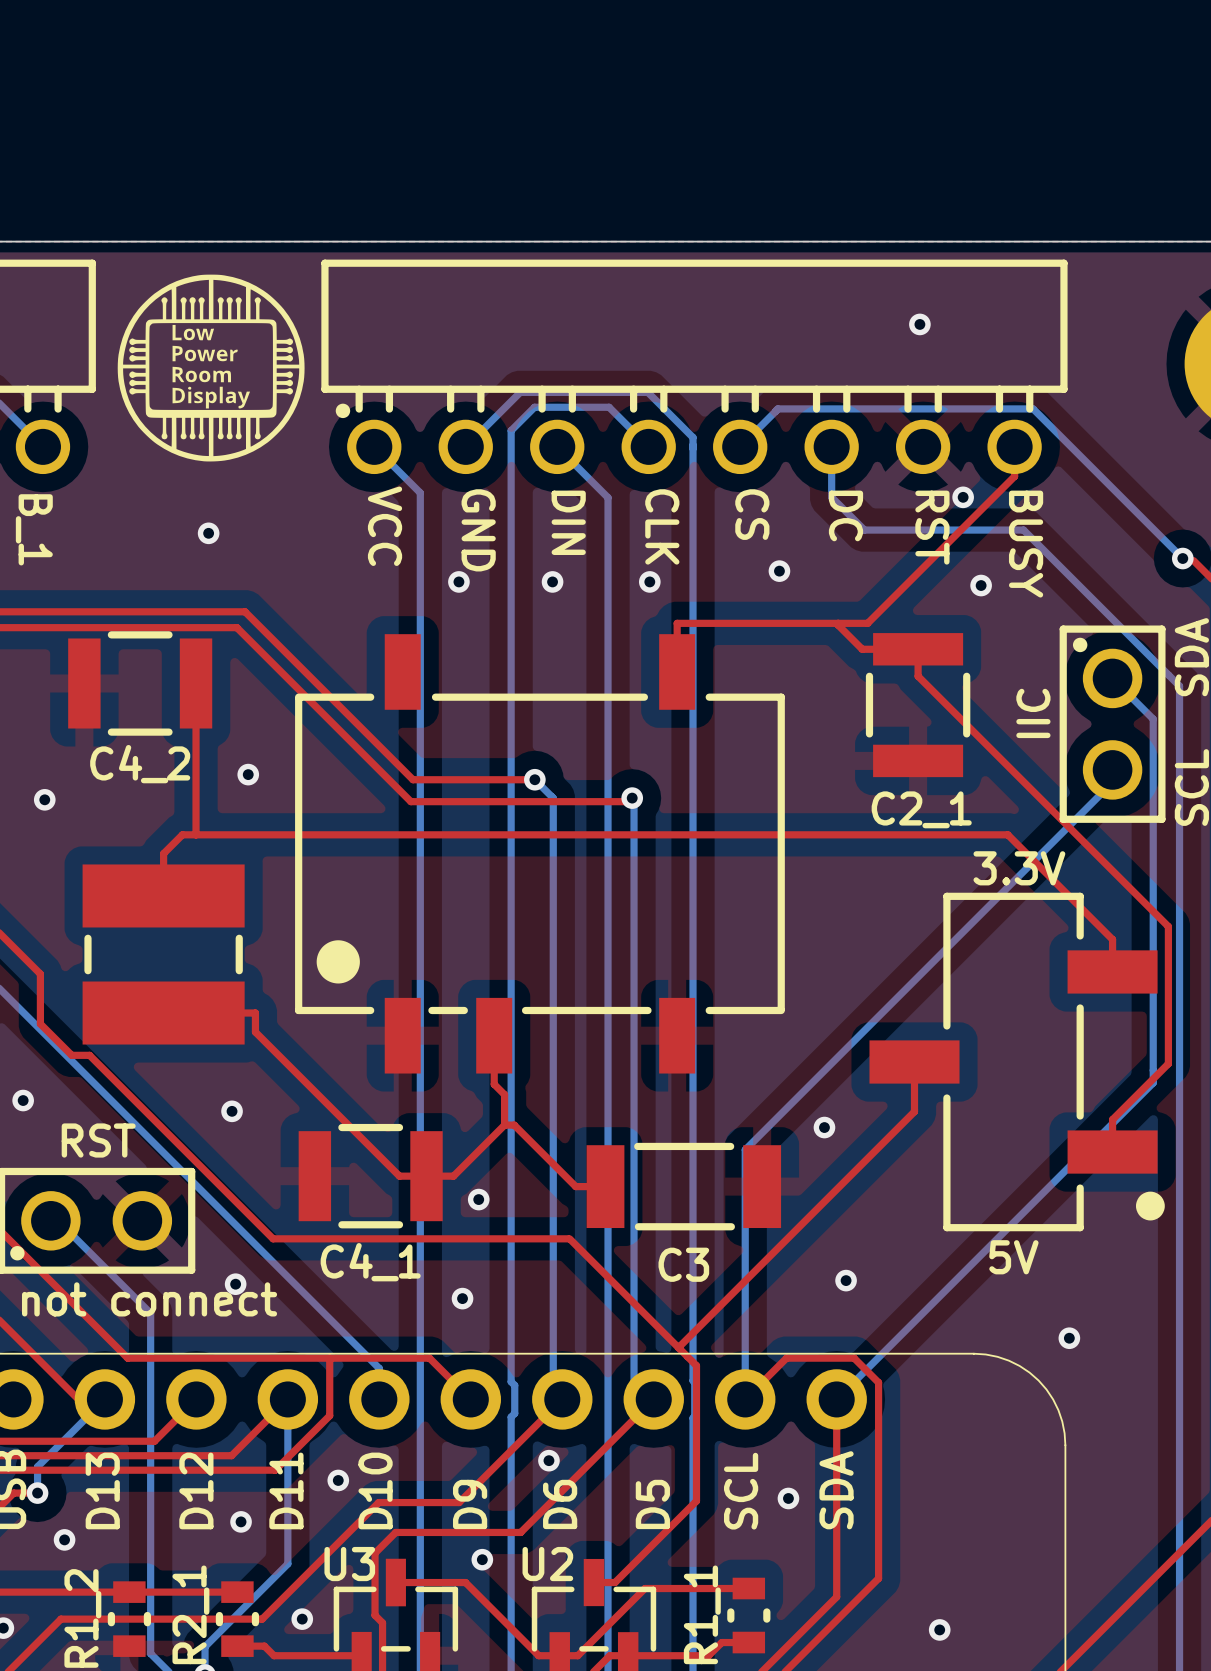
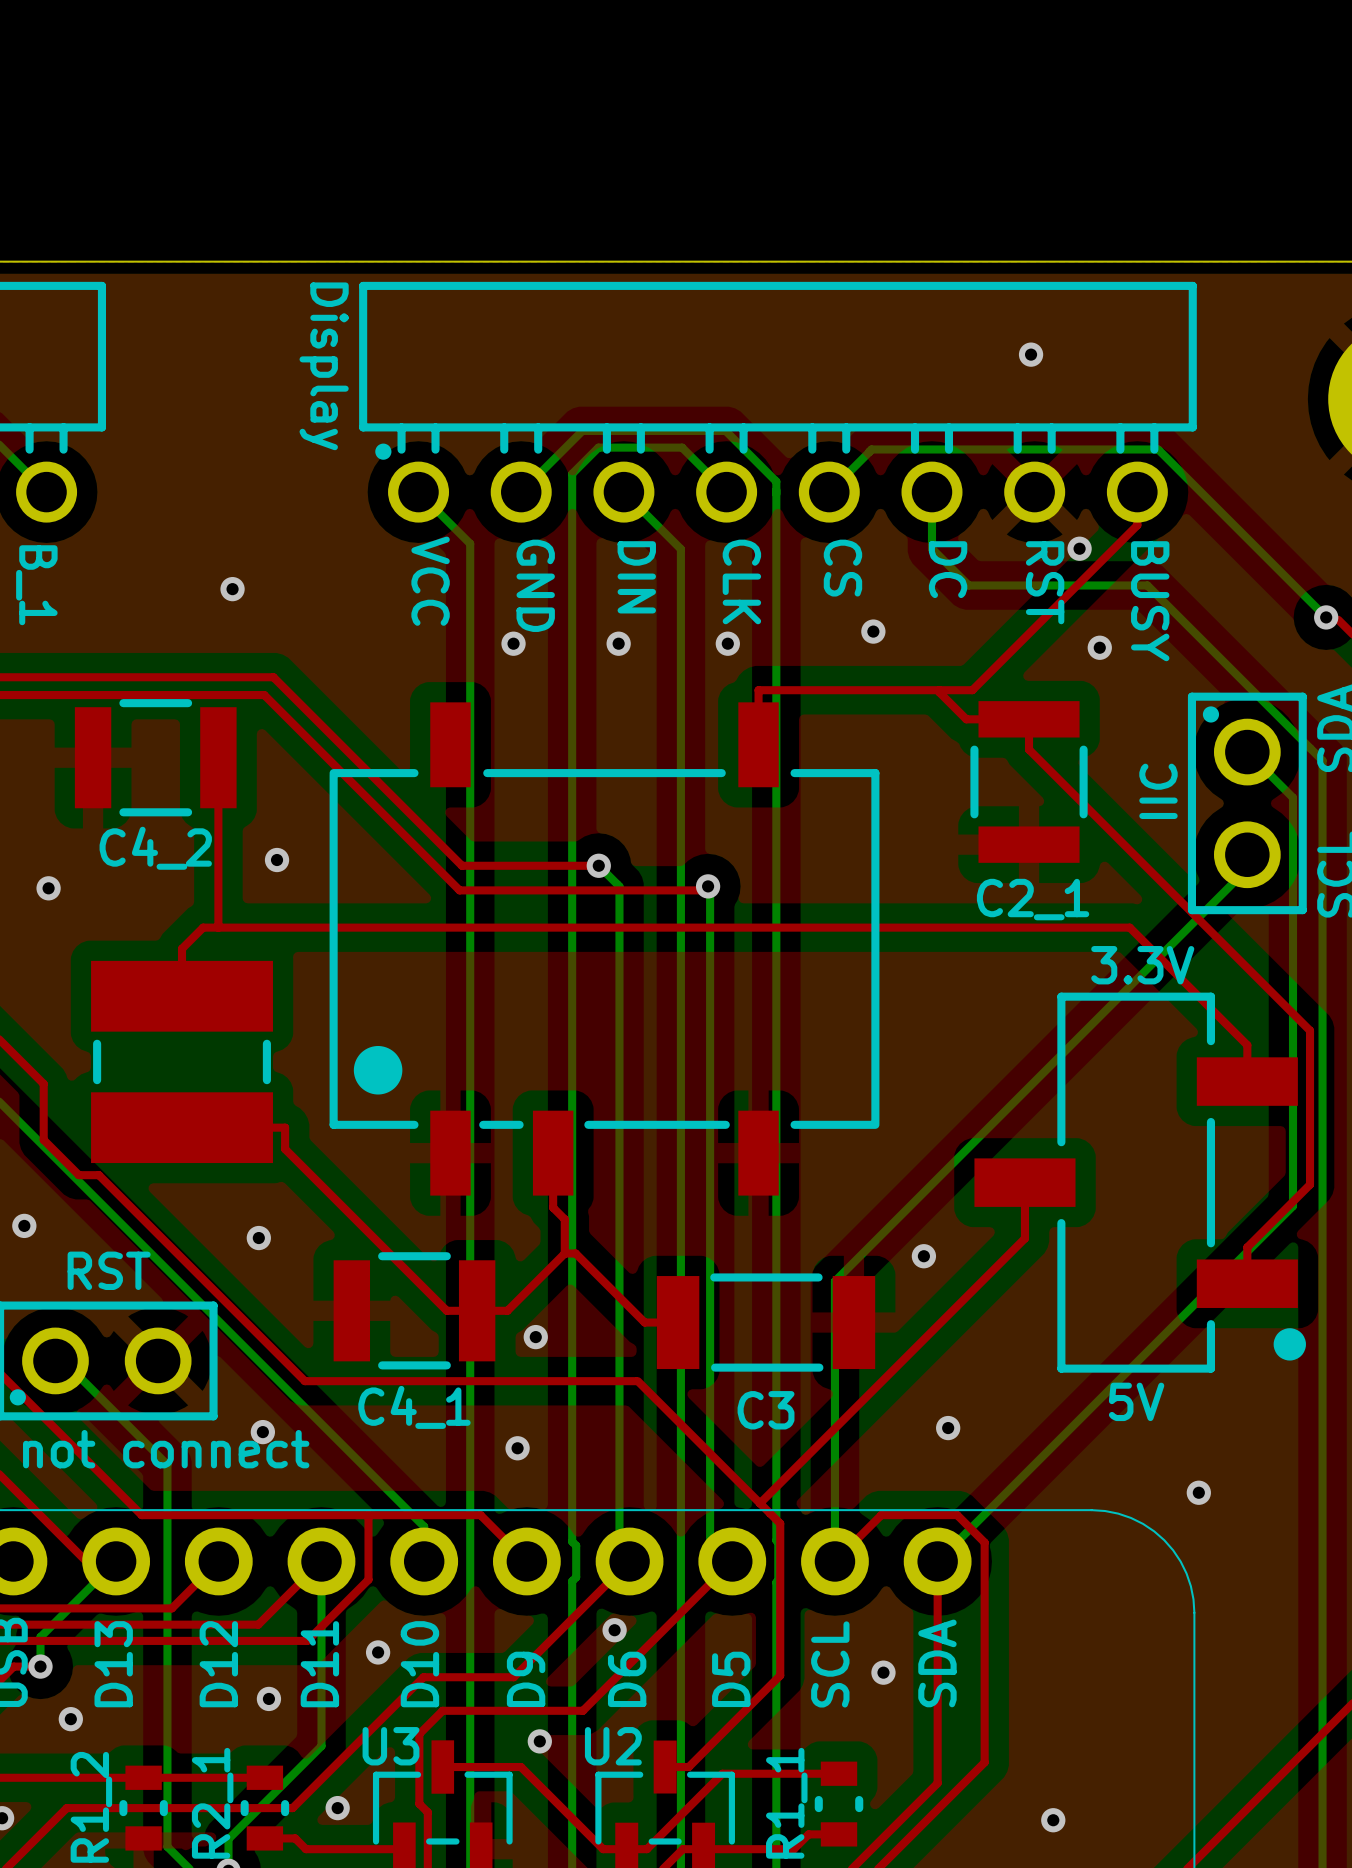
drawing: [117, 274, 305, 462] -> none
text: none -> Display (324, 366)

